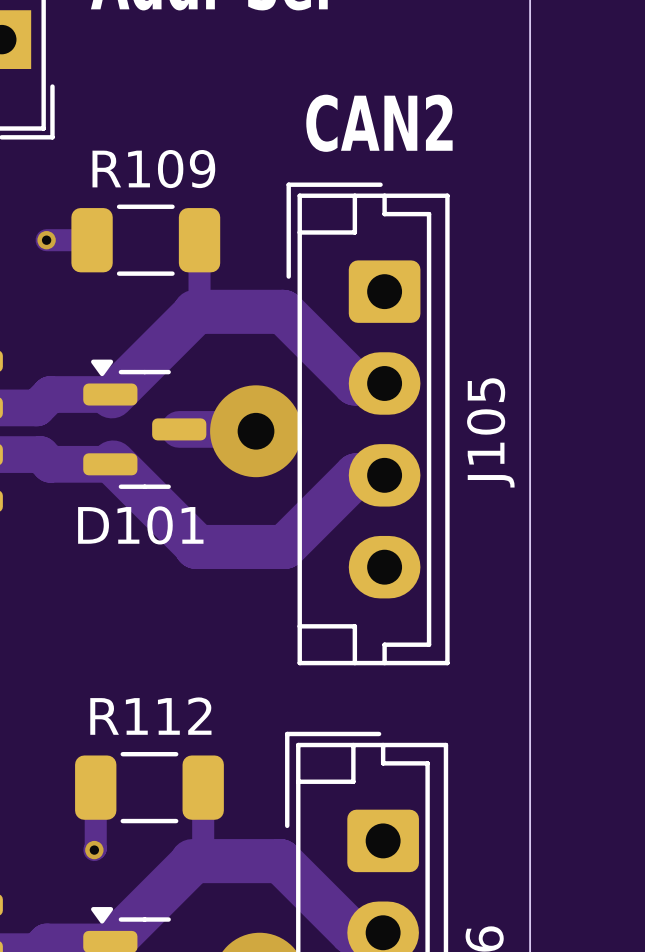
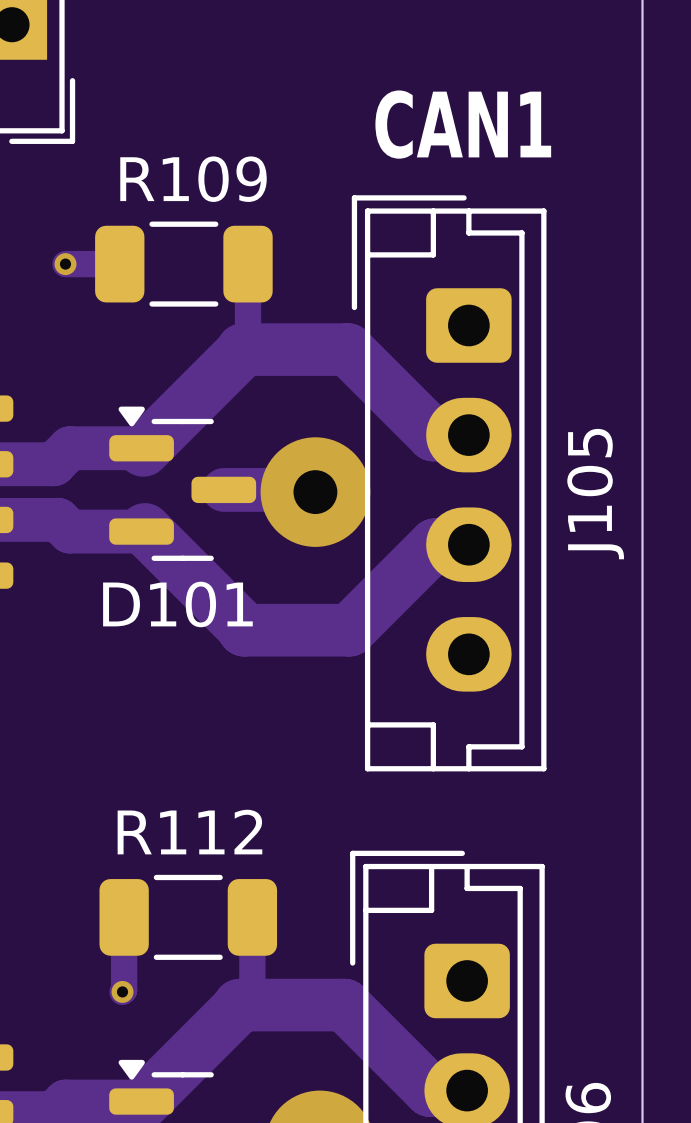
text: CAN2 (379, 123) -> CAN1 (463, 124)

